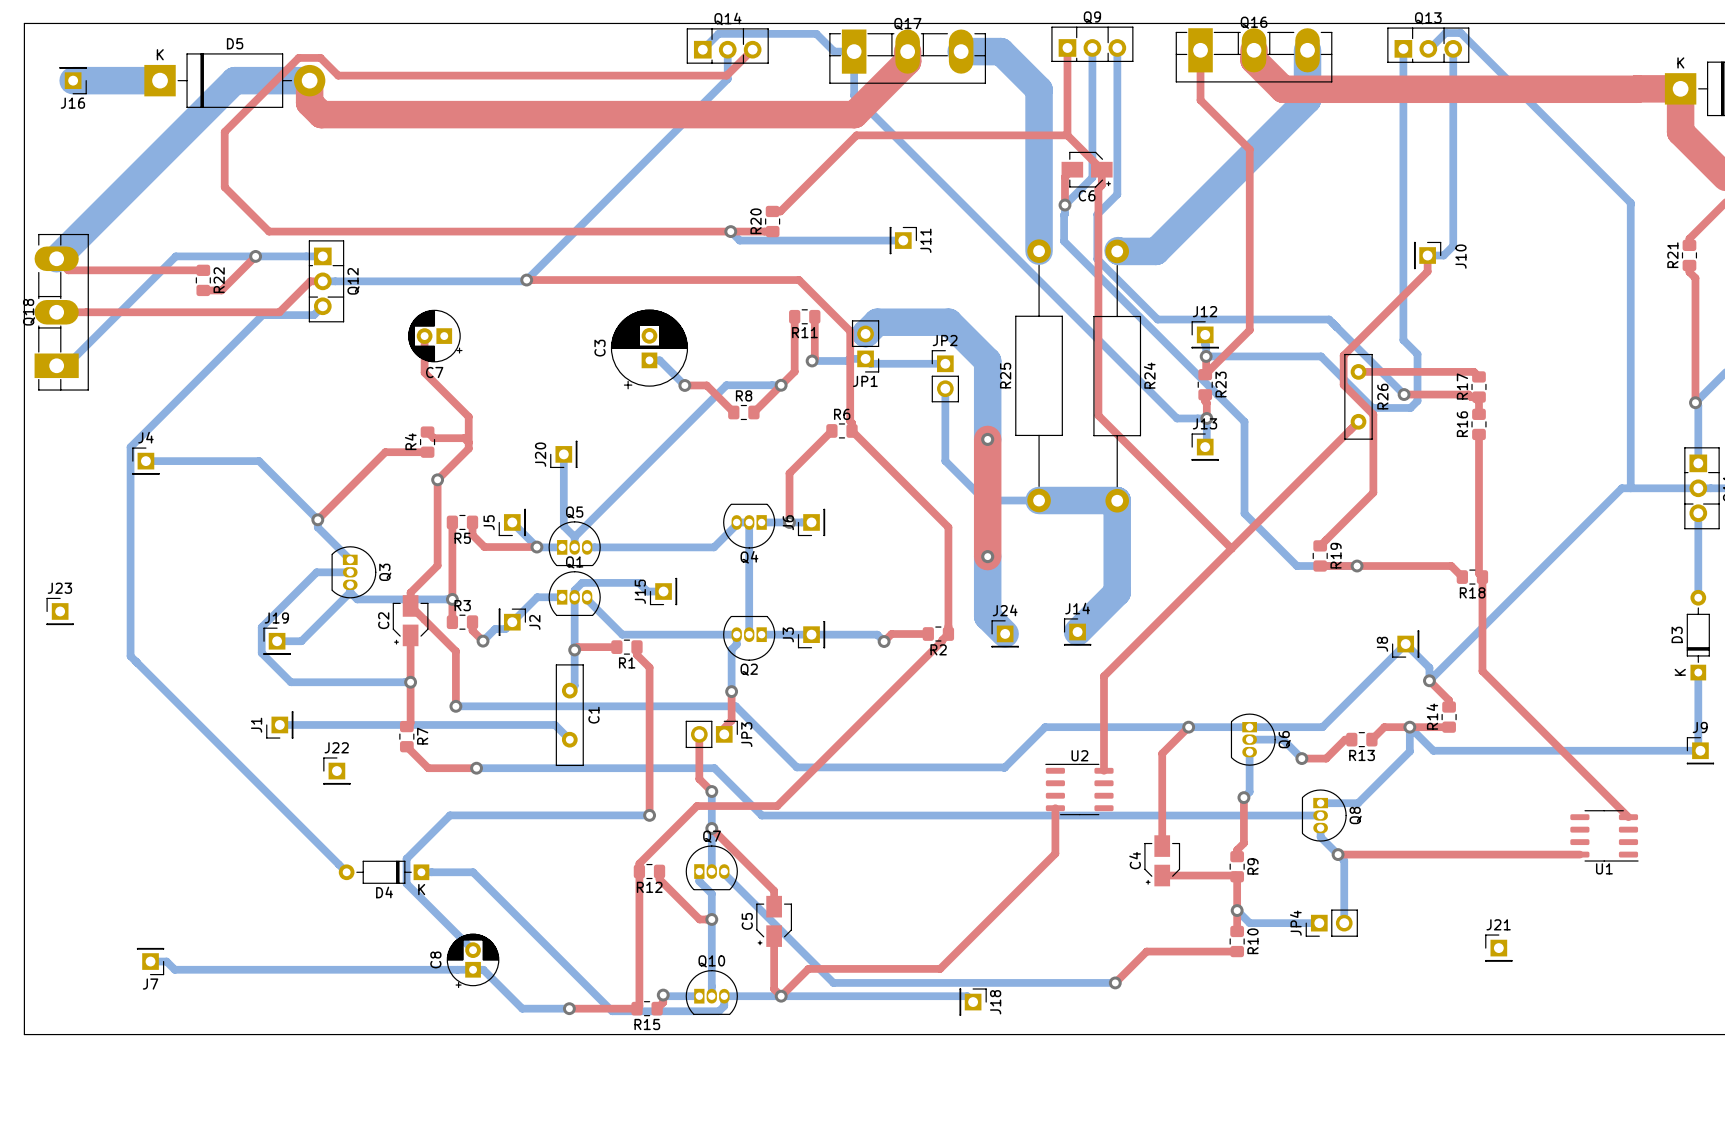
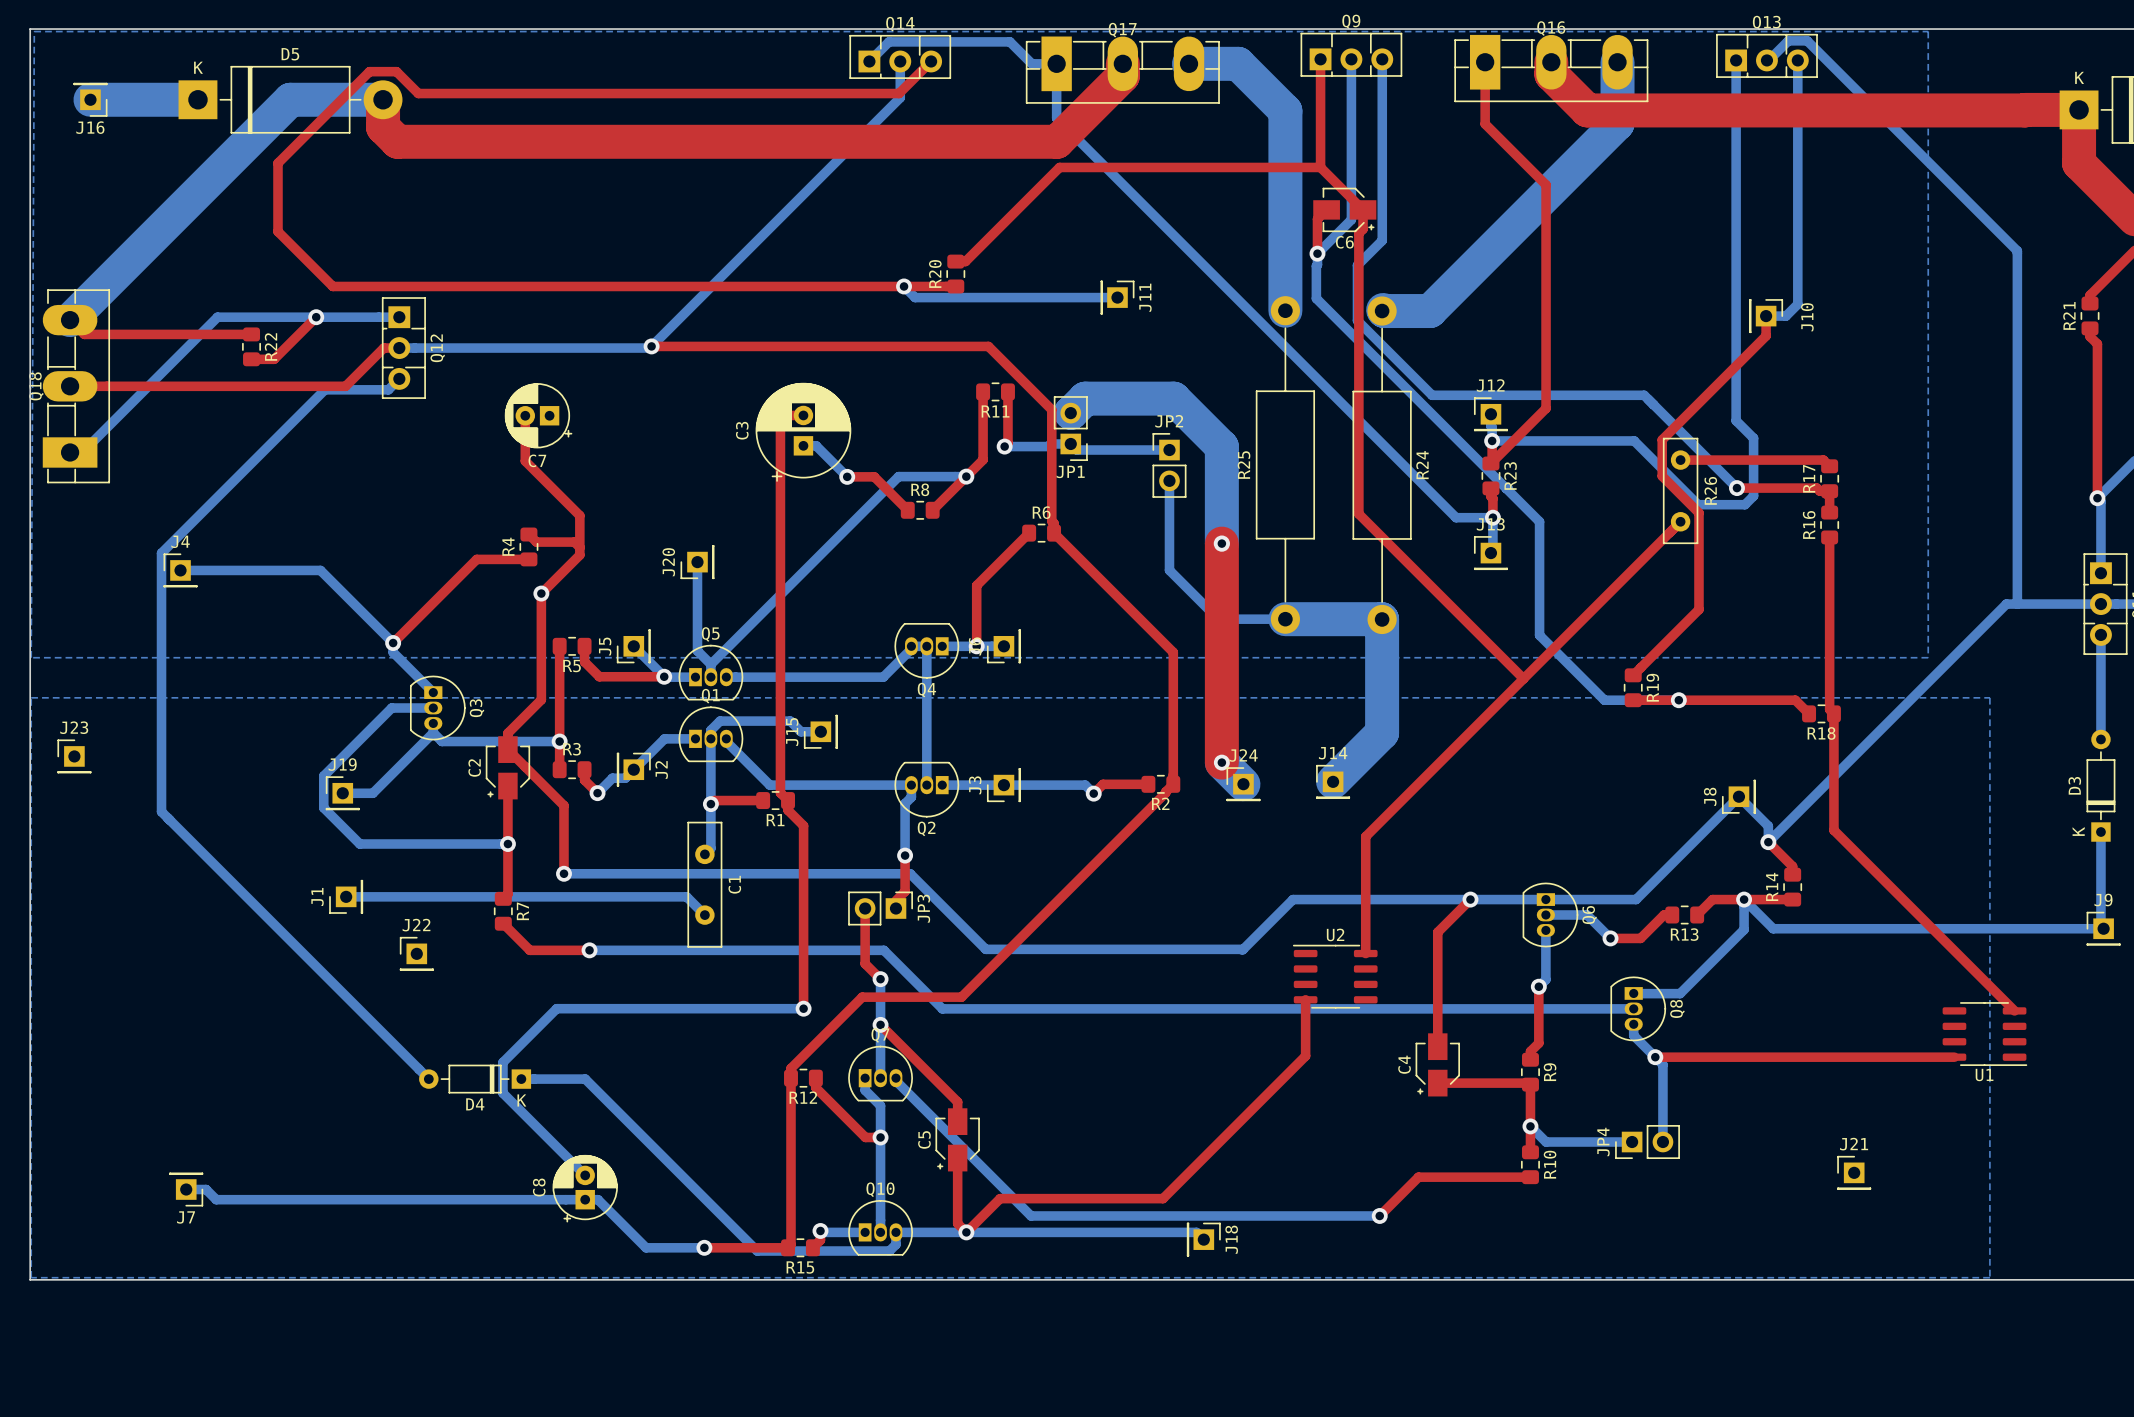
bottom zone outline: none -> (34, 31) (1928, 31) (1928, 657) (31, 657) (34, 31)
top track: none -> (803, 415) (789, 415) (780, 424) (780, 792) (788, 800)
top track: none -> (1221, 688) (1221, 762)
bottom track: (987, 556) (987, 616) -> none
via: (987, 556) -> none
bottom zone outline: none -> (31, 697) (1989, 697) (1989, 1277) (31, 1277) (31, 697)
via: none -> (1221, 762)

